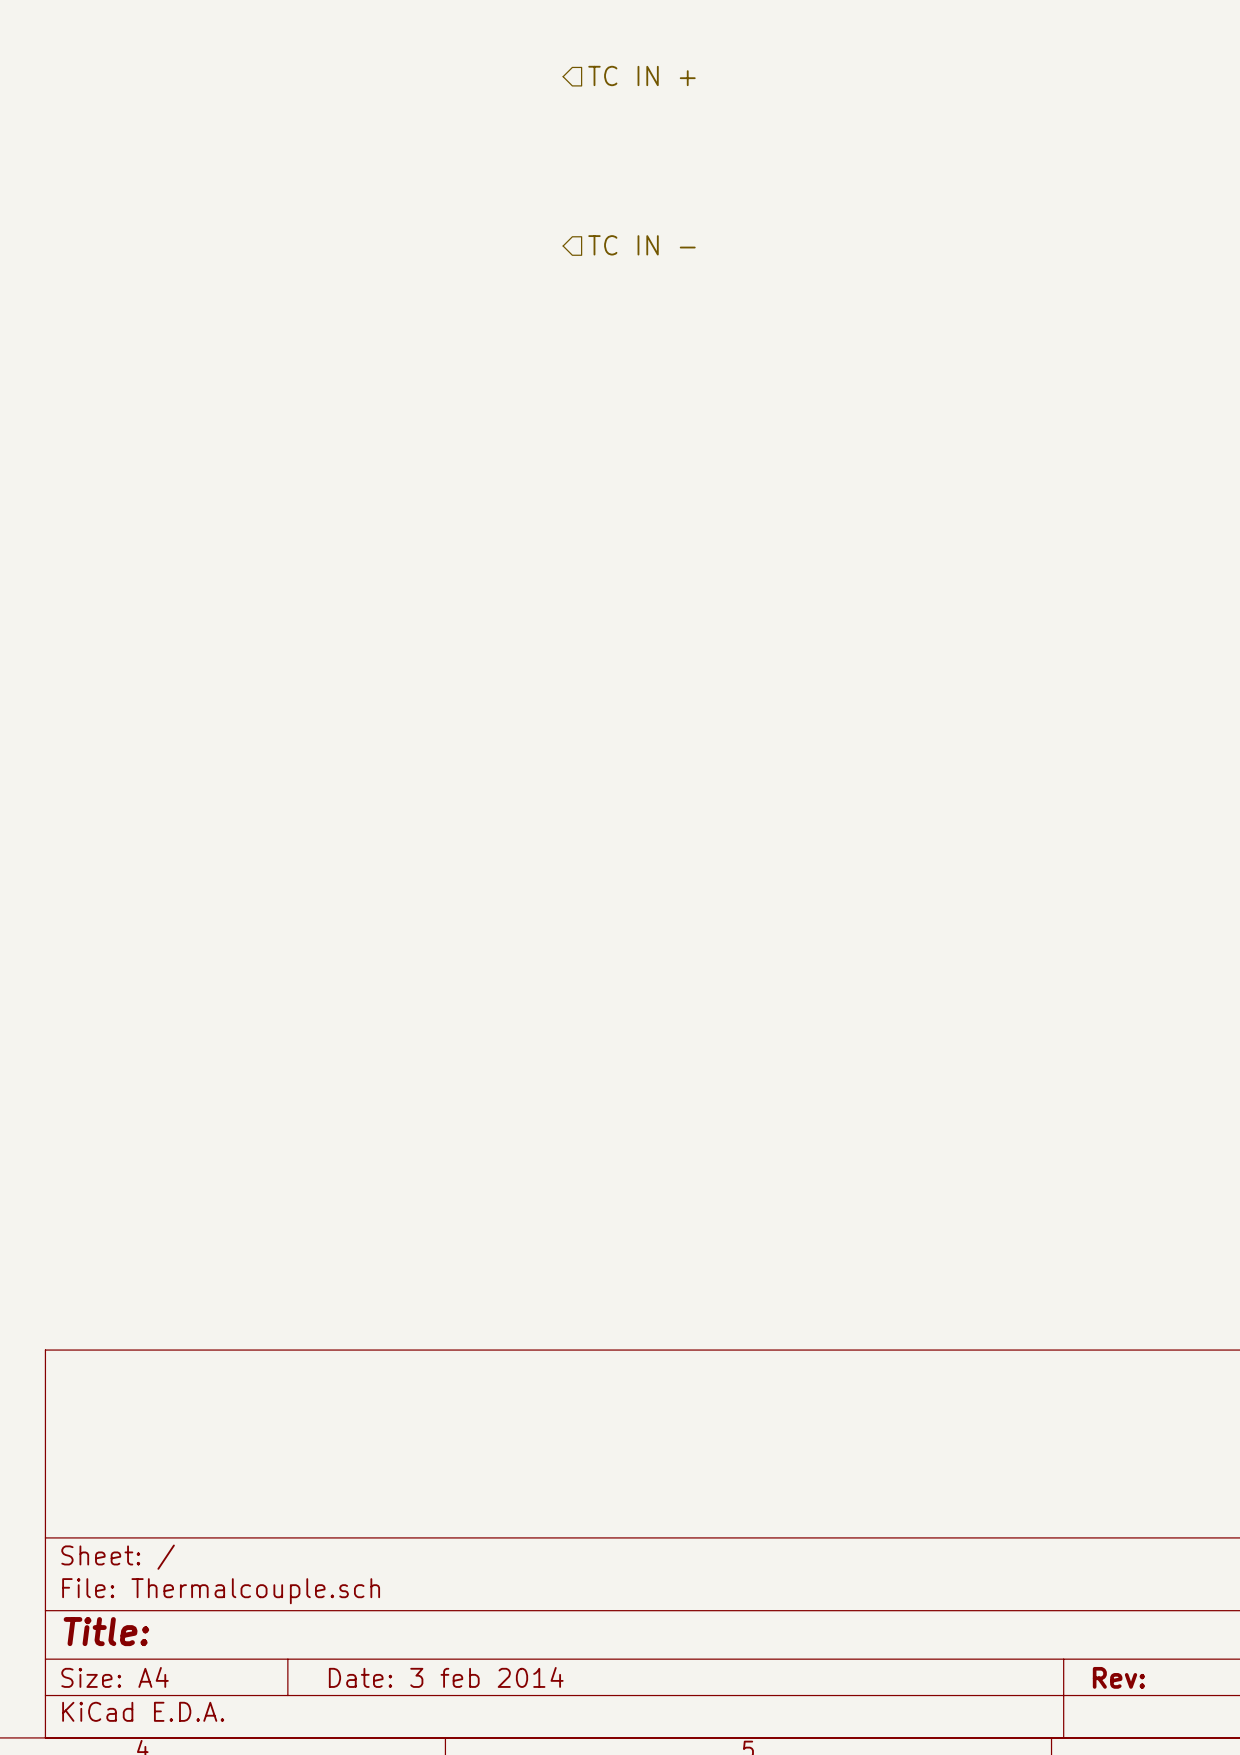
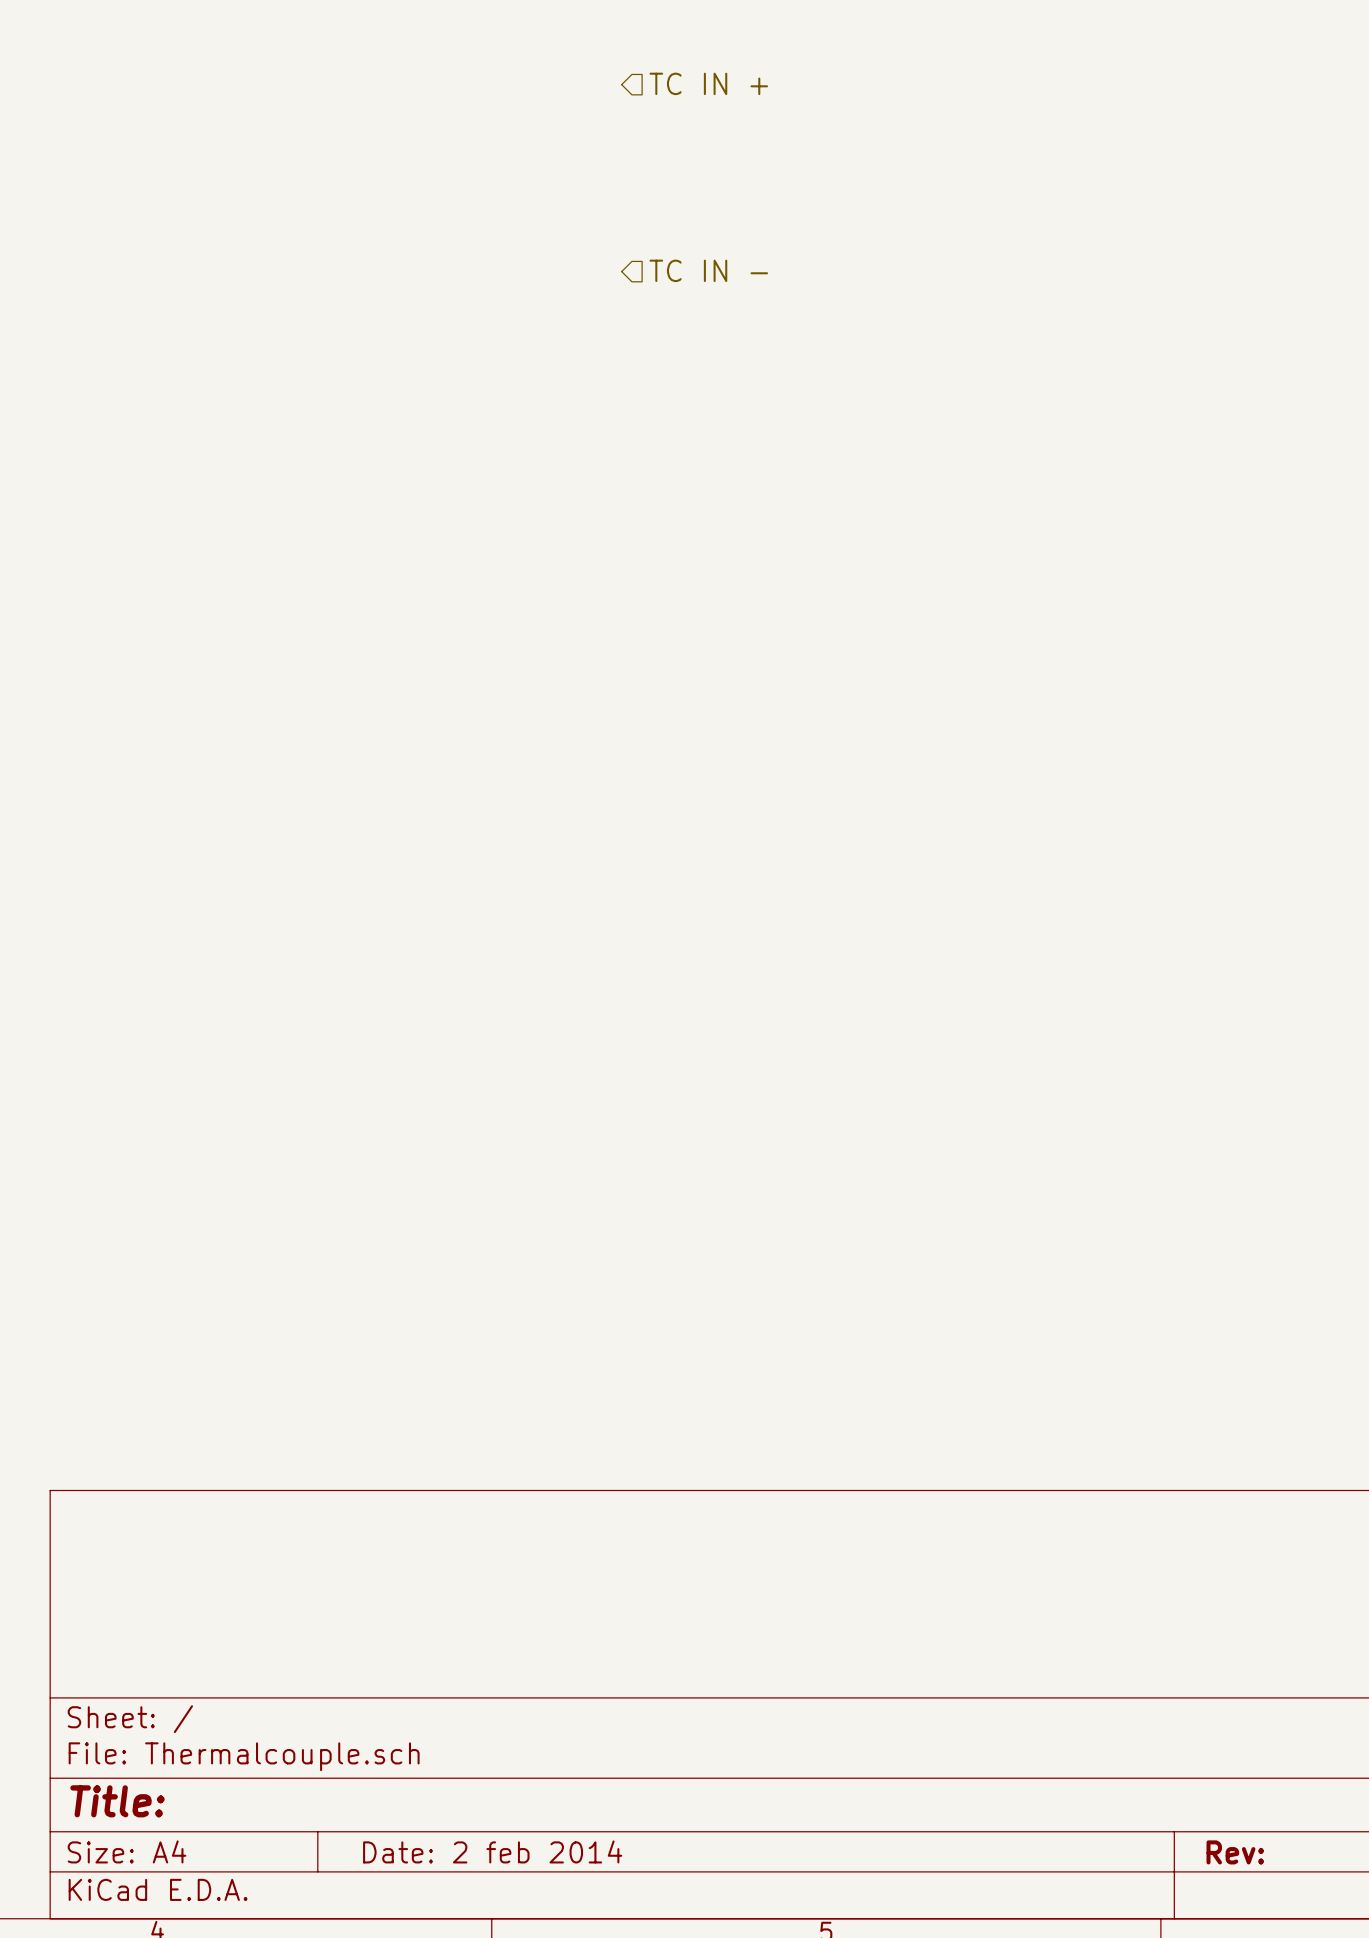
title block: Date: 3 feb 2014 (446, 1677) -> Date: 2 feb 2014 (492, 1851)

